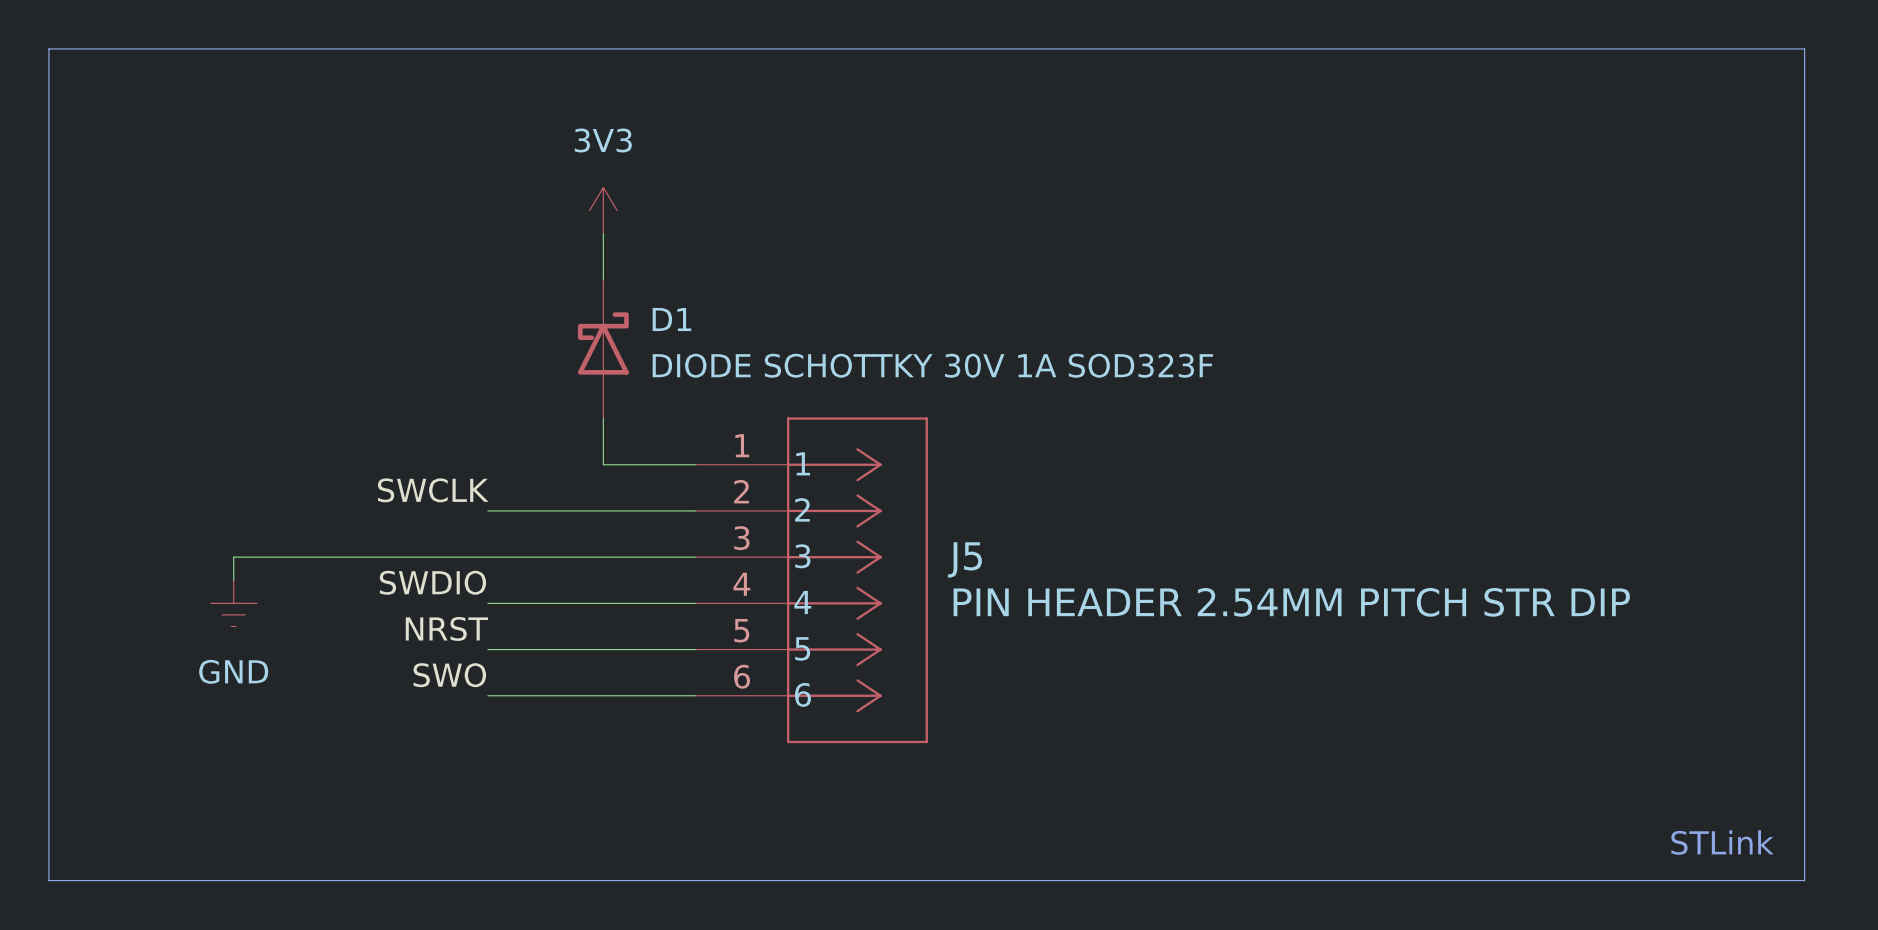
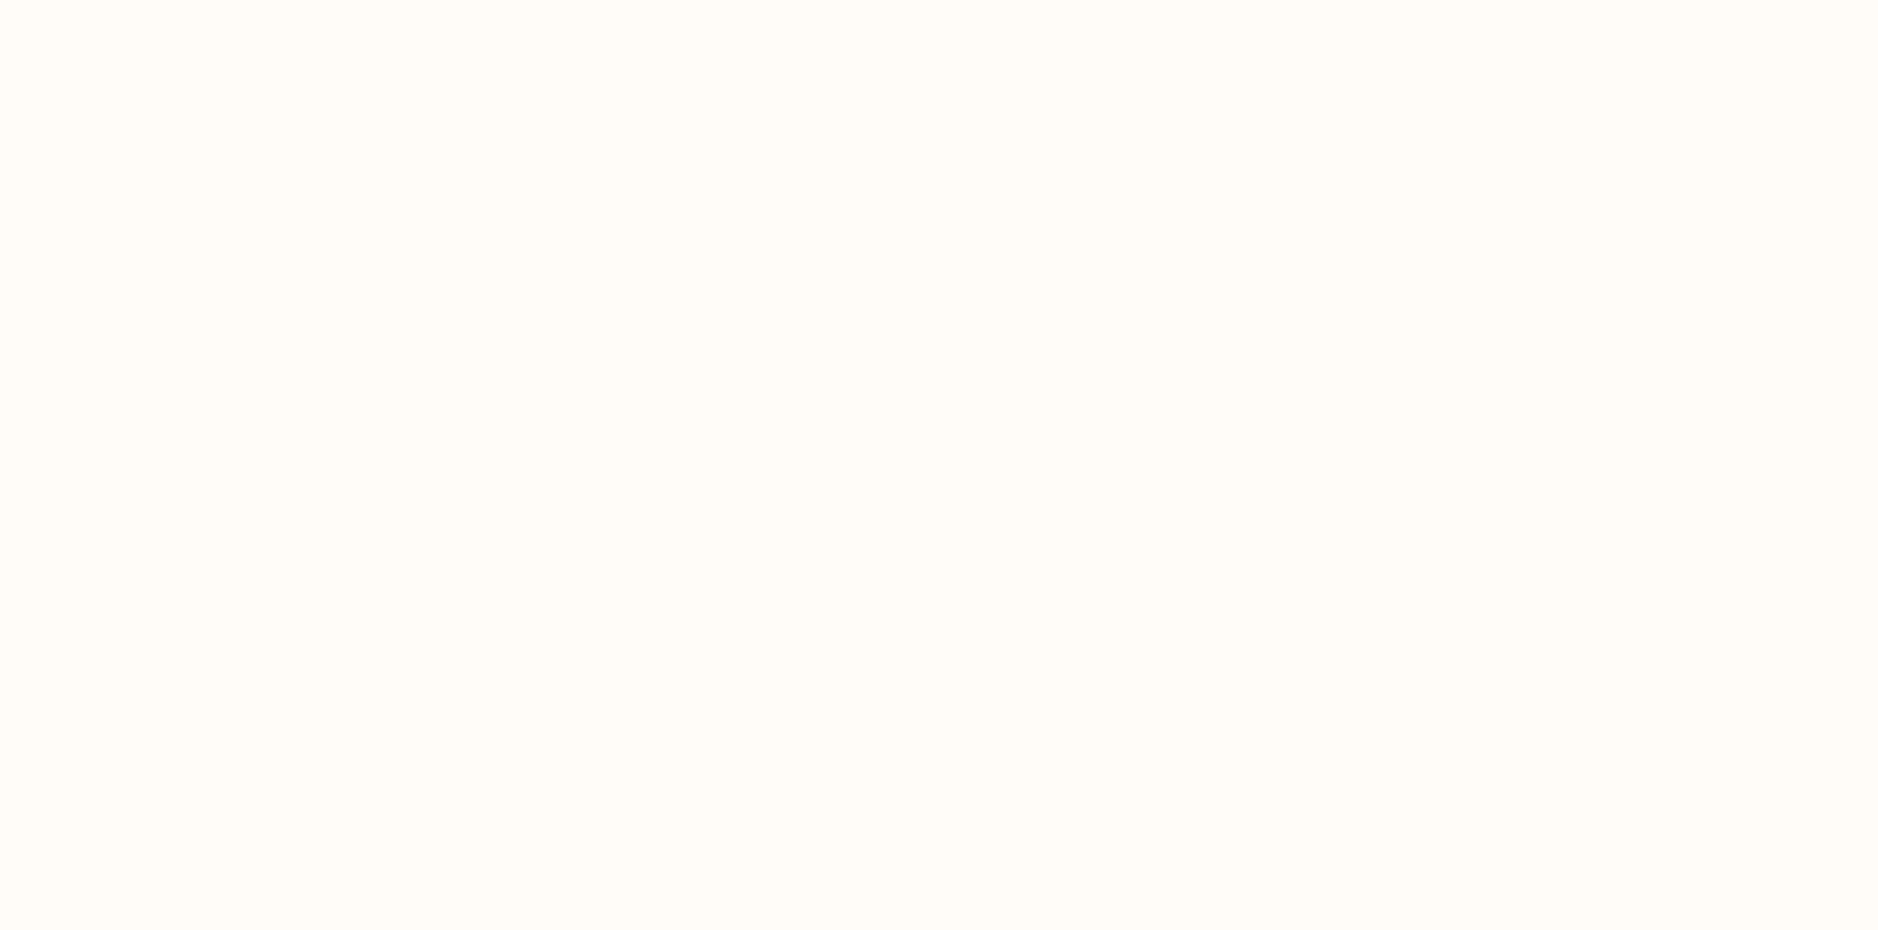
line: (48, 48) (48, 880) (1804, 880) (1804, 48) (48, 48) -> none
power symbol: 3V3 (603, 210) -> none
wire: (603, 233) (603, 279) -> none
D1: DIODE SCHOTTKY 30V 1A SOD323F (603, 349) -> none
wire: (603, 418) (603, 464) (695, 464) -> none
label: SWCLK (433, 490) -> none
wire: (487, 510) (695, 510) -> none
wire: (695, 557) (233, 557) (233, 580) -> none
J5: PIN HEADER 2.54MM PITCH STR DIP (811, 580) -> none
label: SWDIO (432, 582) -> none
power symbol: GND (233, 603) -> none
wire: (487, 603) (695, 603) -> none
label: NRST (446, 628) -> none
wire: (487, 649) (695, 649) -> none
label: SWO (449, 675) -> none
wire: (487, 695) (695, 695) -> none
text: STLink (1722, 842) -> none

